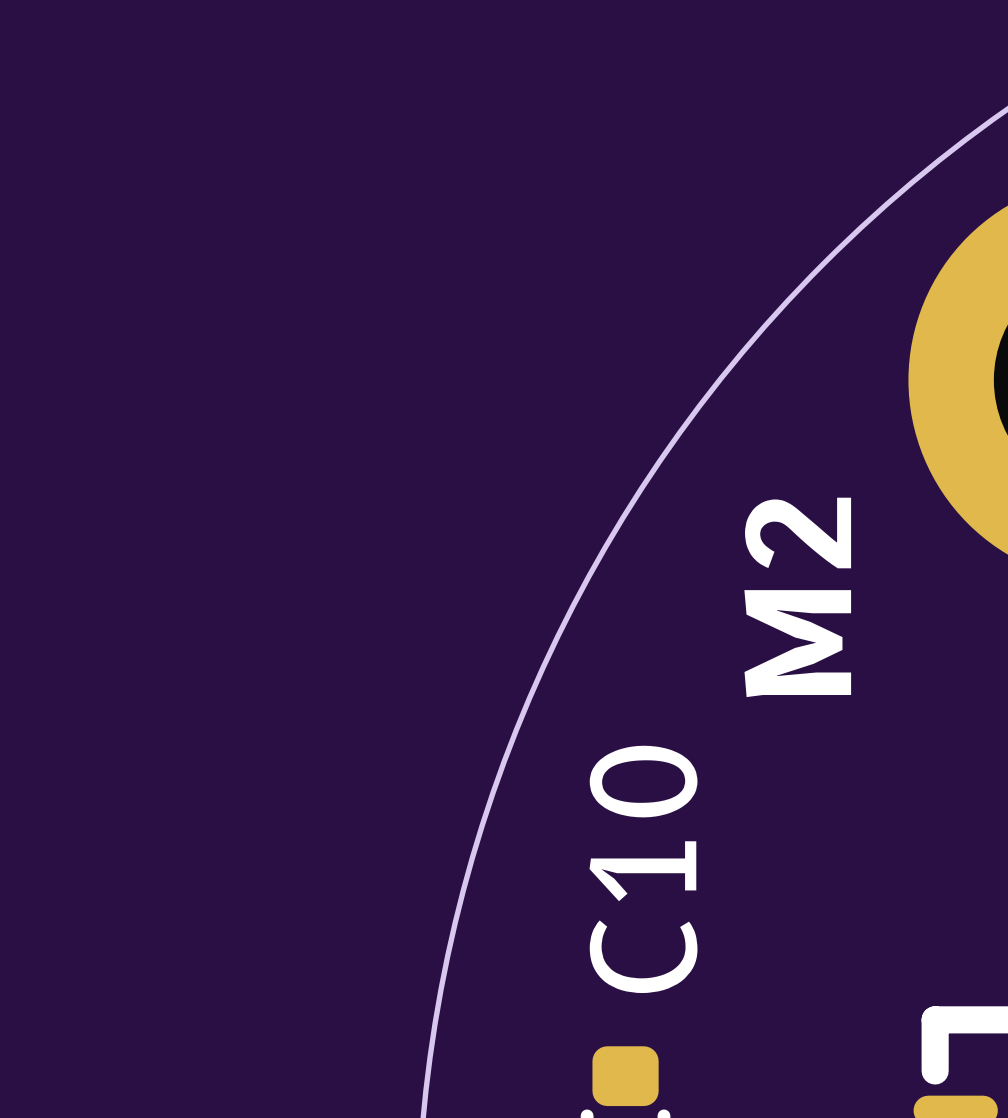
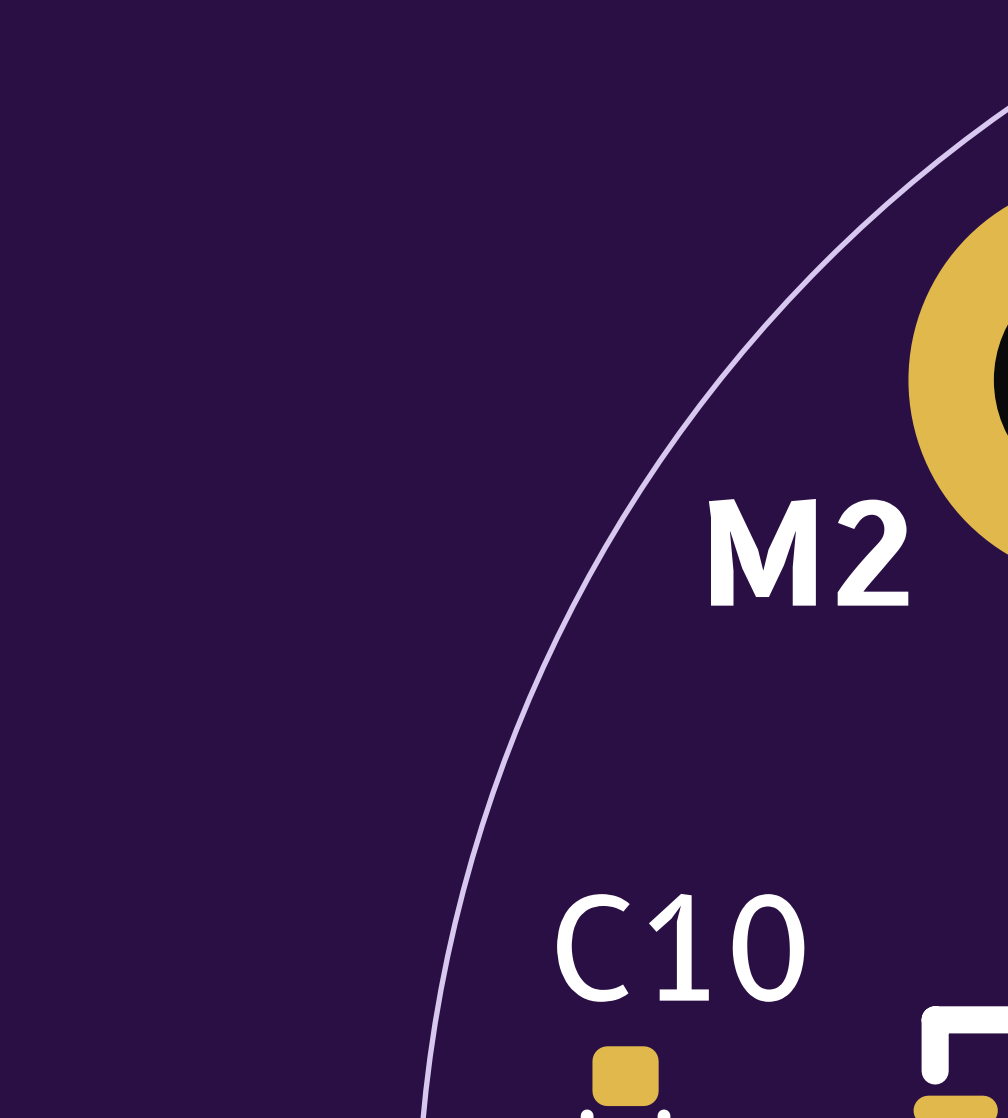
M2 name rotation: 0° (797, 597) -> 90° clockwise (808, 552)
C10 name rotation: 0° (643, 869) -> 90° clockwise (680, 947)

